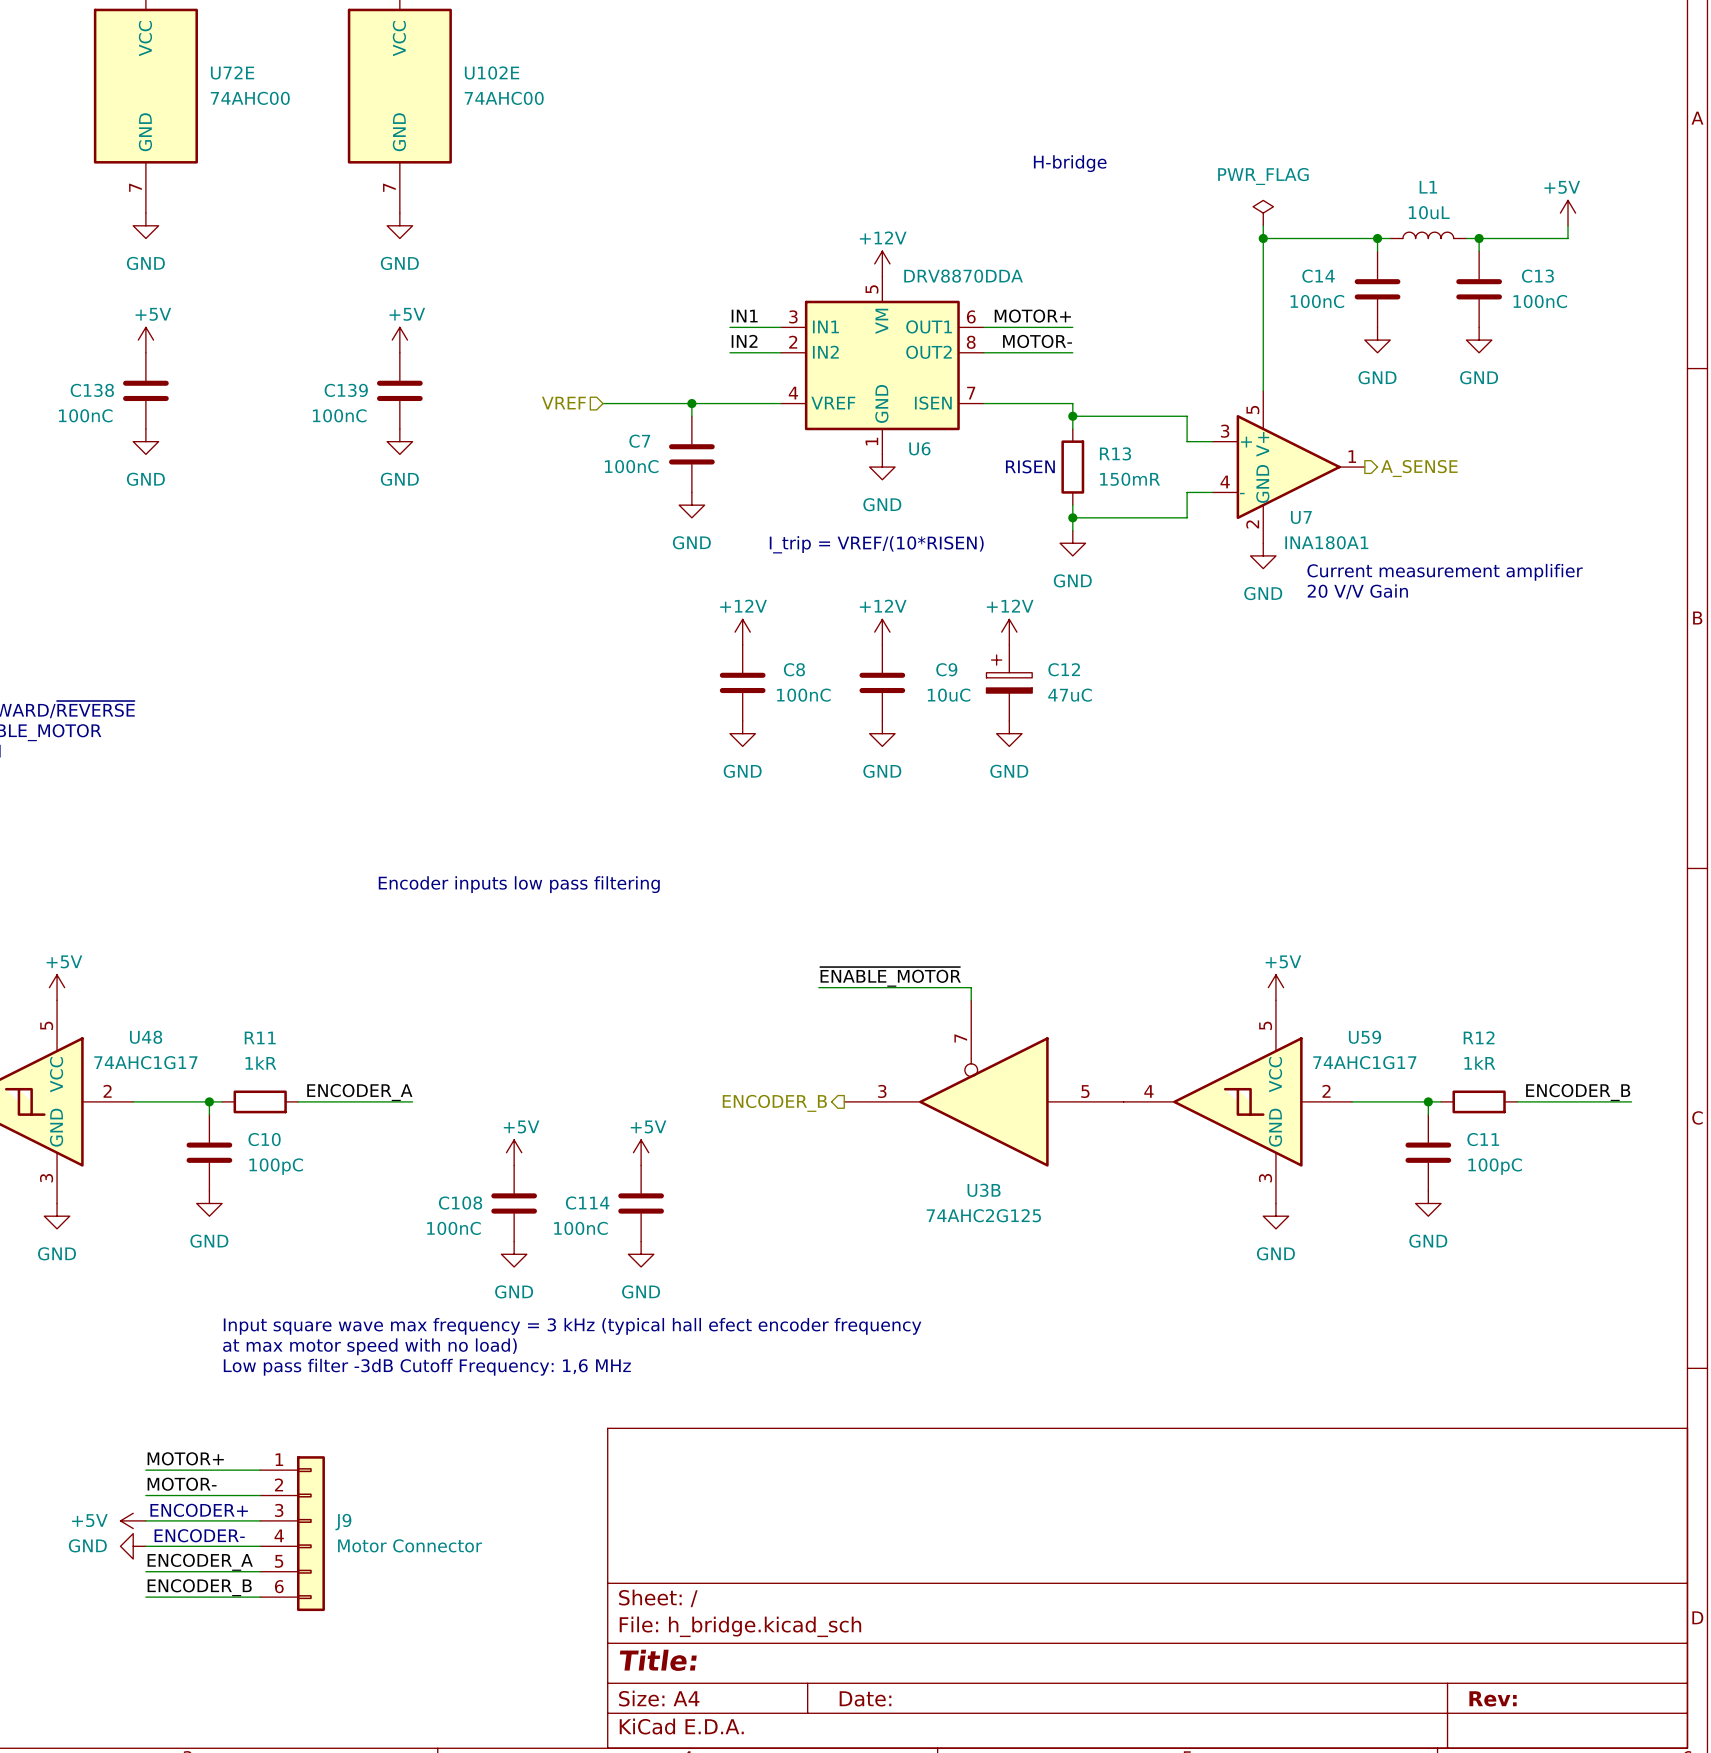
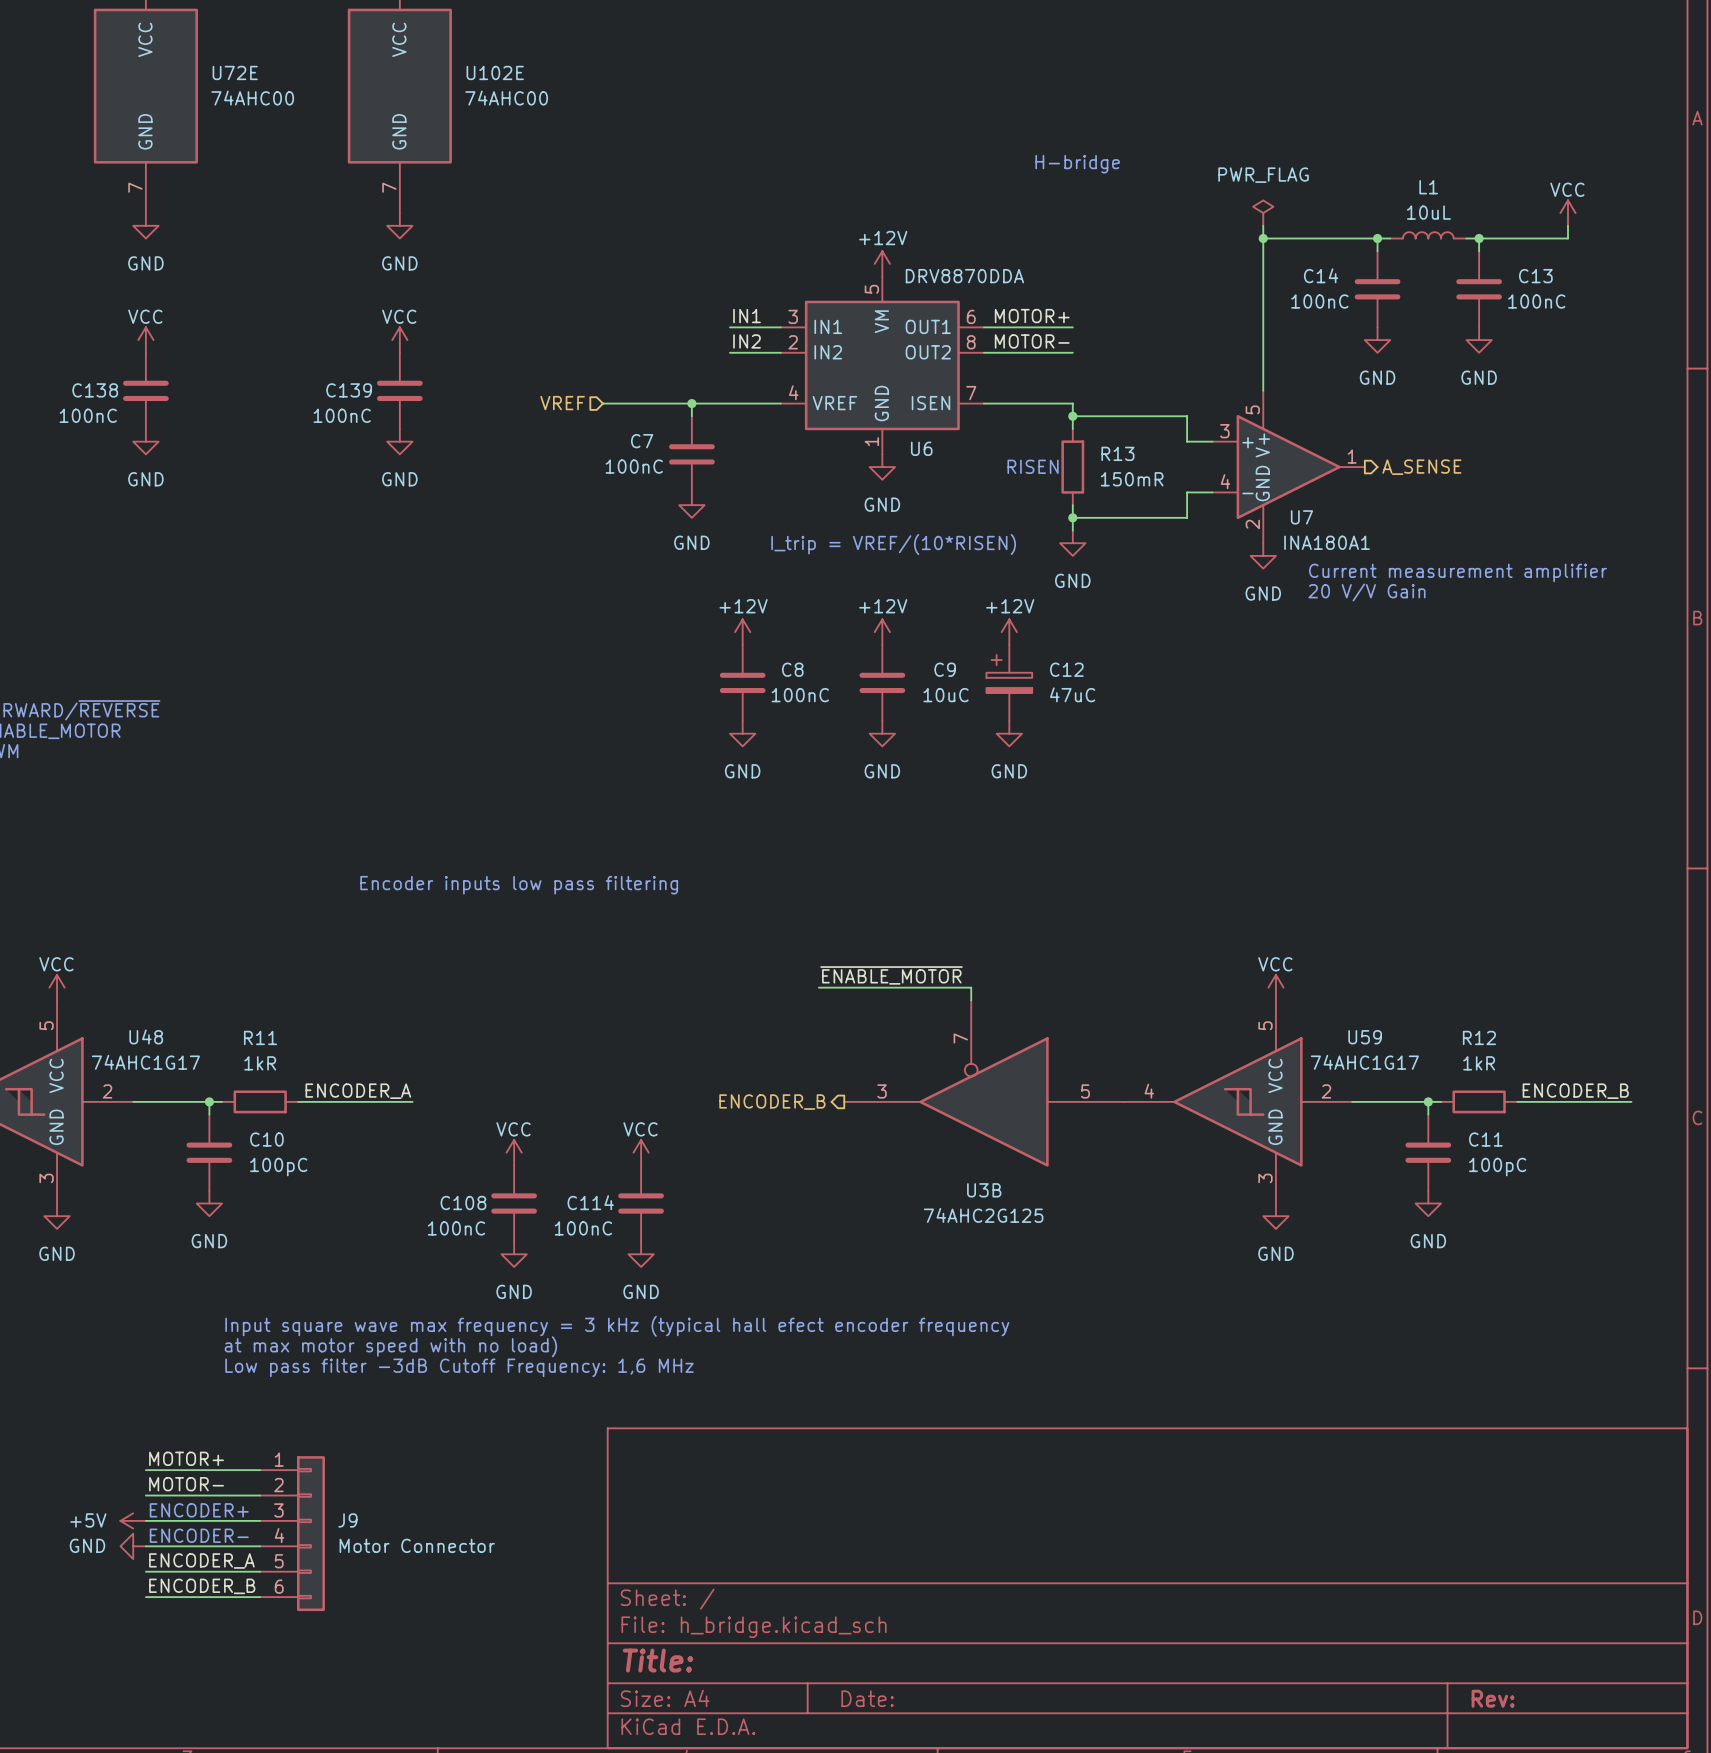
power symbol: +5V (1568, 213) -> VCC (1568, 213)
power symbol: +5V (145, 340) -> VCC (145, 340)
power symbol: +5V (399, 340) -> VCC (399, 340)
power symbol: +5V (57, 987) -> VCC (57, 987)
power symbol: +5V (1275, 987) -> VCC (1275, 987)
power symbol: +5V (514, 1152) -> VCC (514, 1152)
power symbol: +5V (641, 1152) -> VCC (641, 1152)

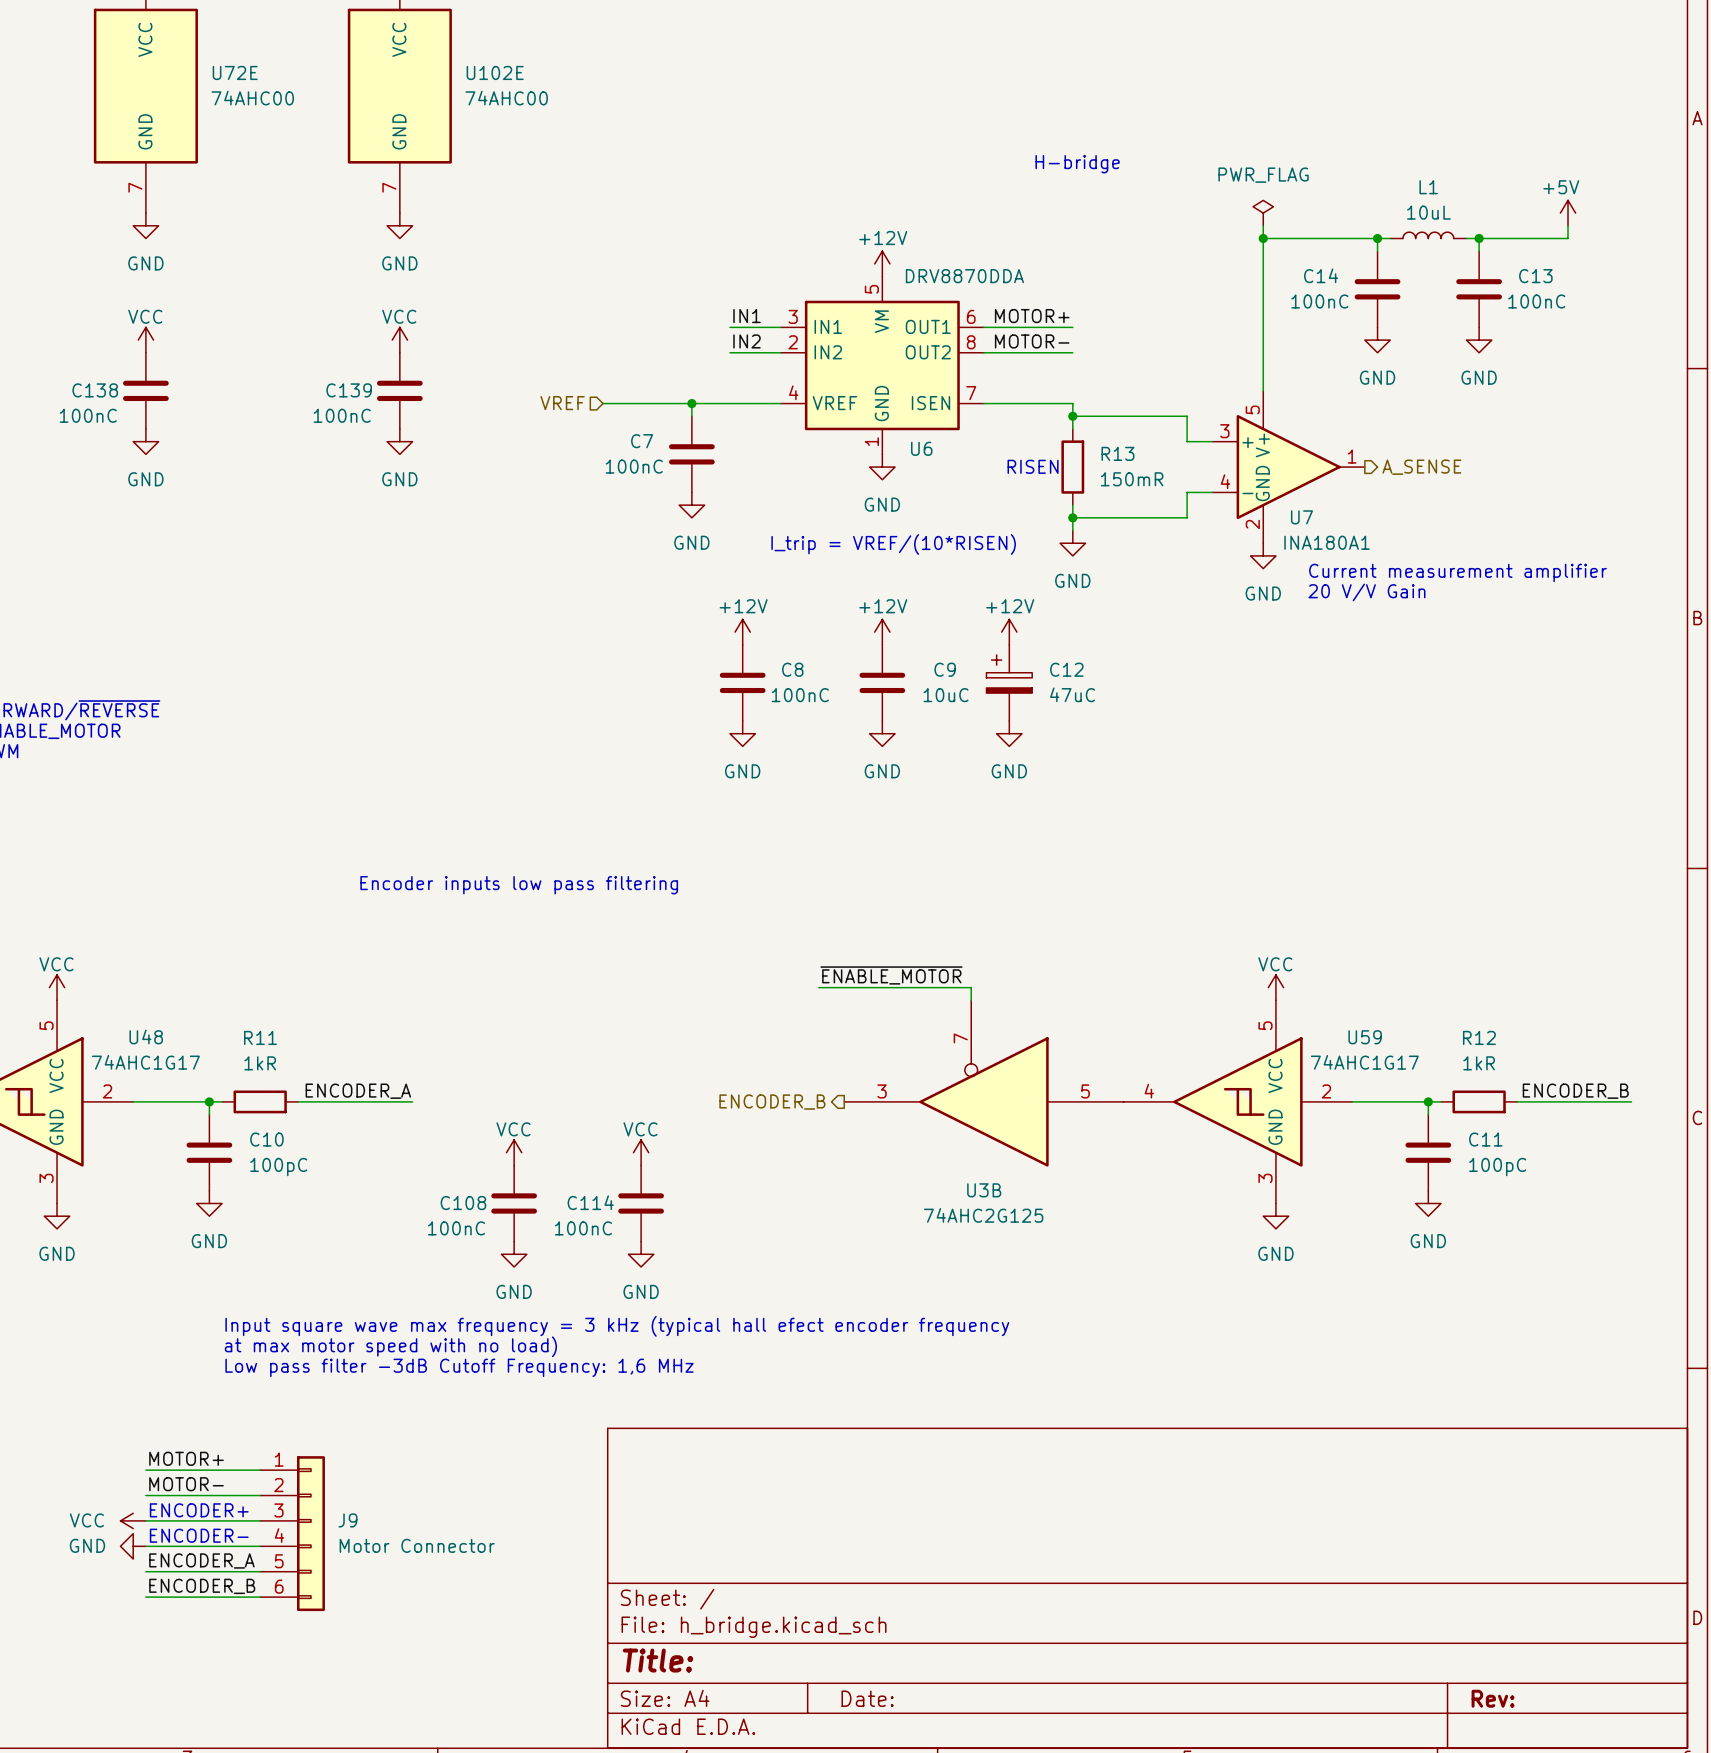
power symbol: VCC (1568, 213) -> +5V (1568, 213)
power symbol: +5V (133, 1520) -> VCC (133, 1520)

